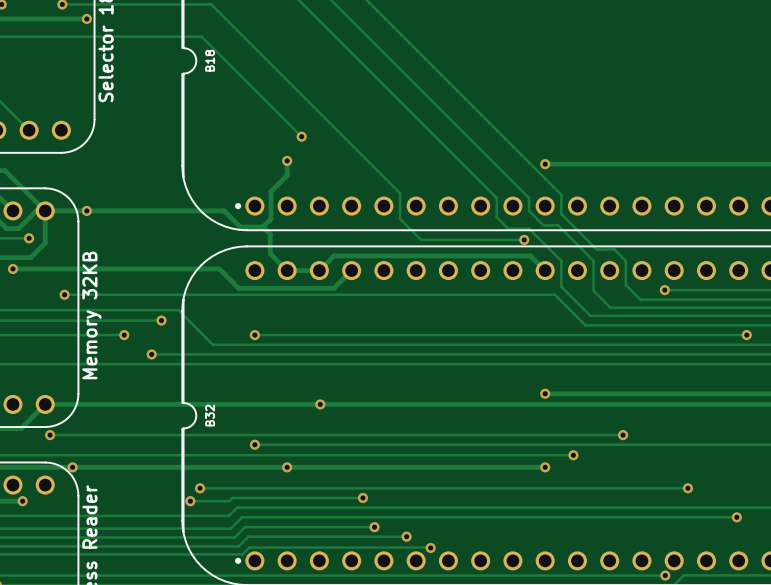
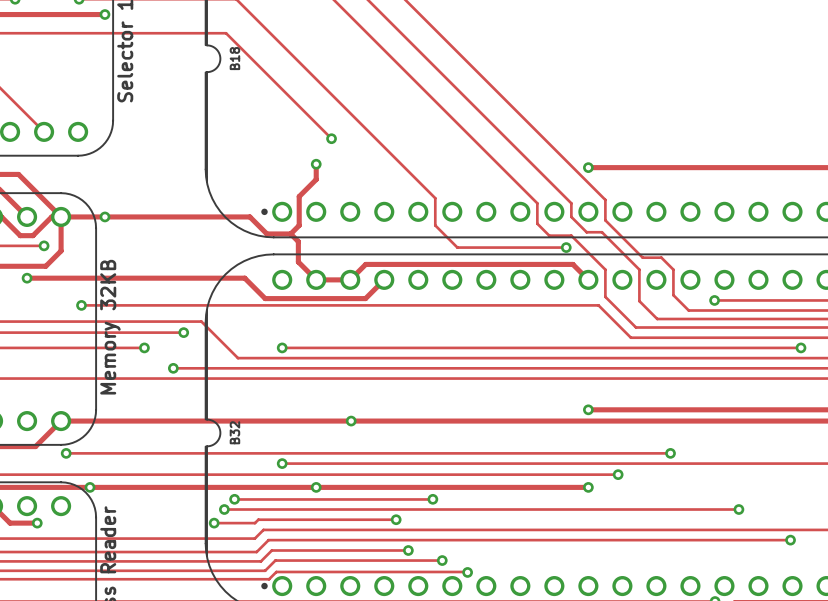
track: none -> (234, 499) (432, 499)
via: none -> (234, 499)
via: none -> (432, 499)

